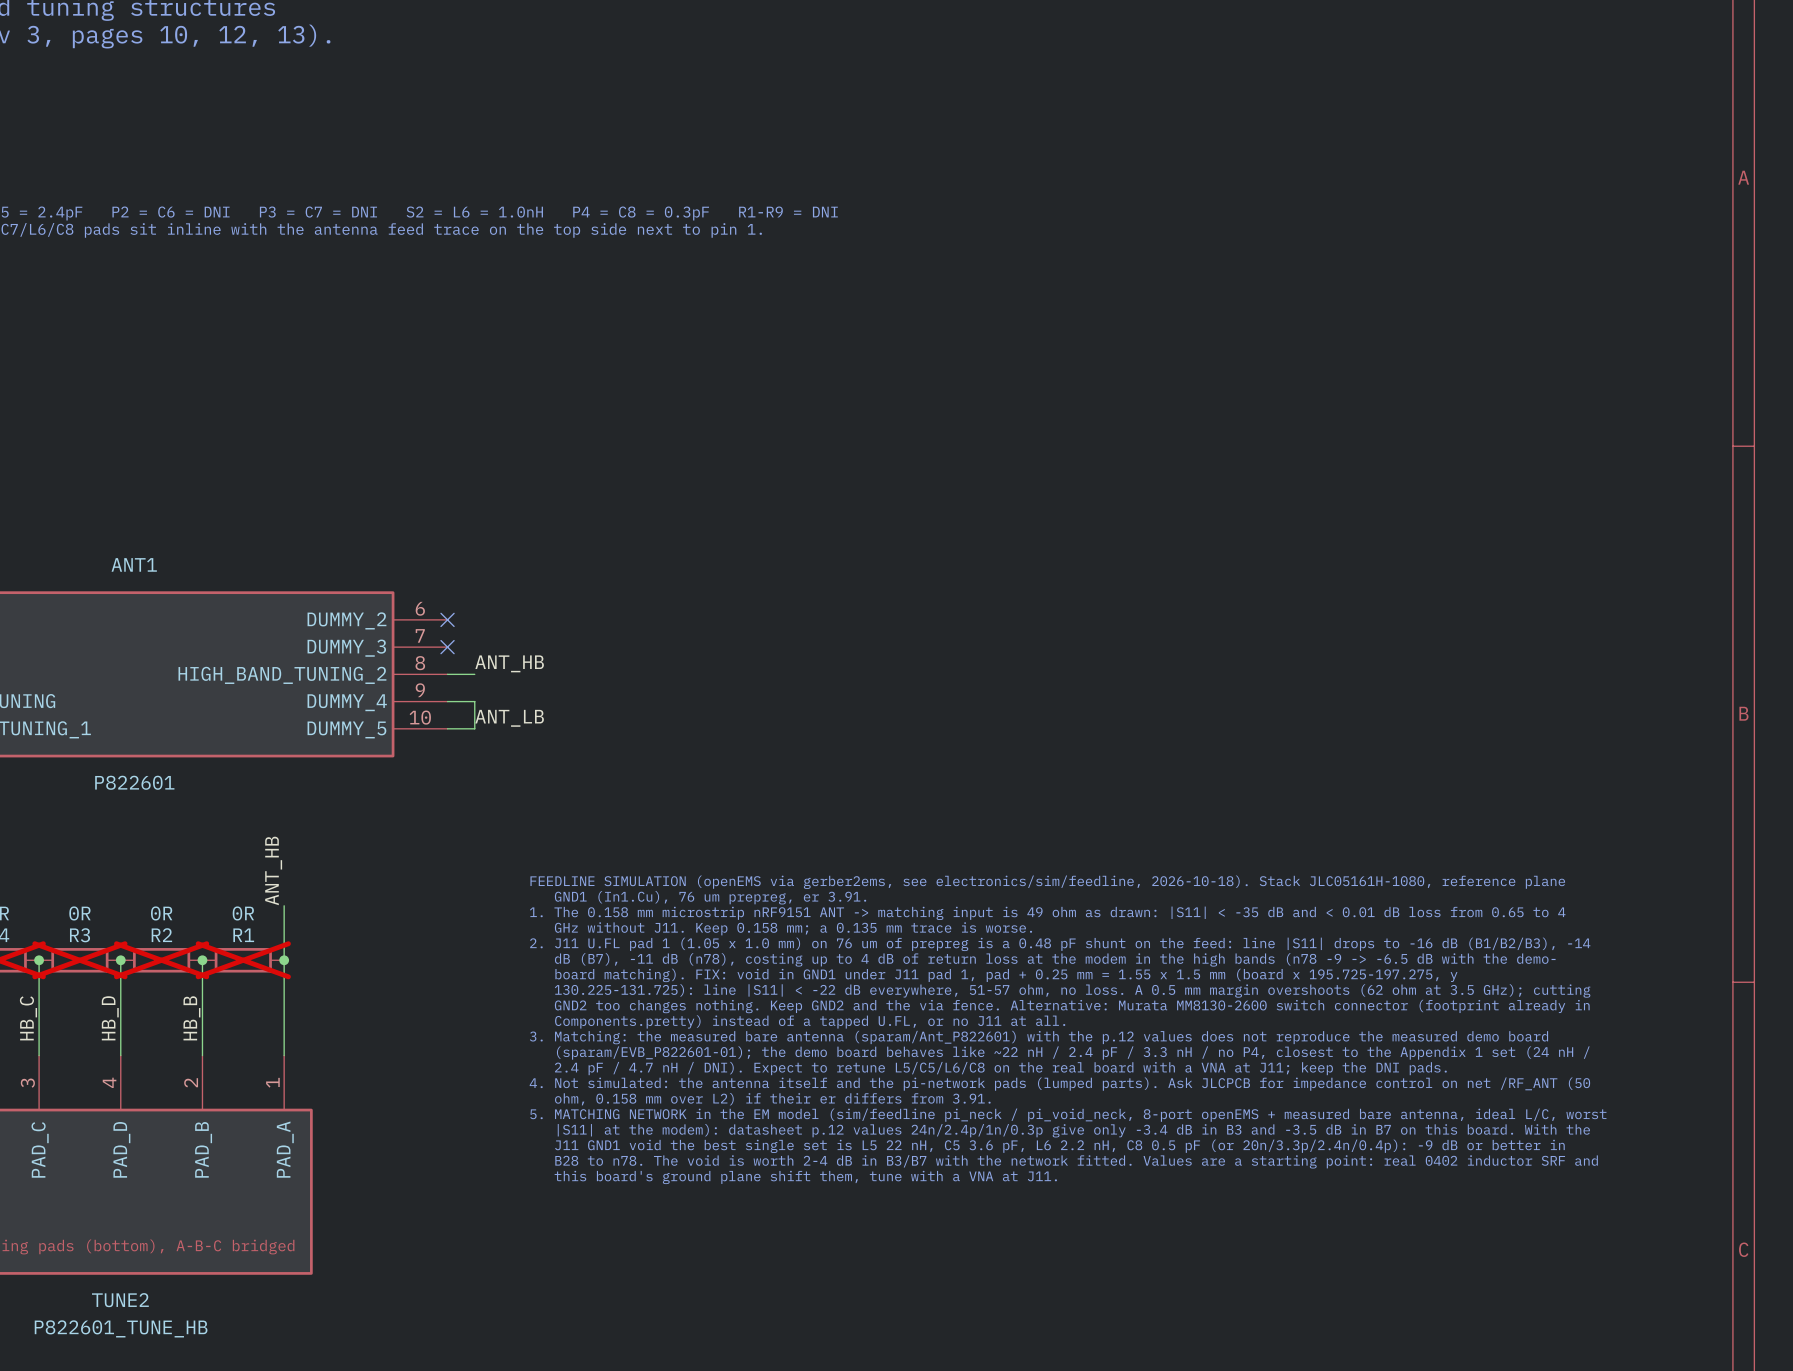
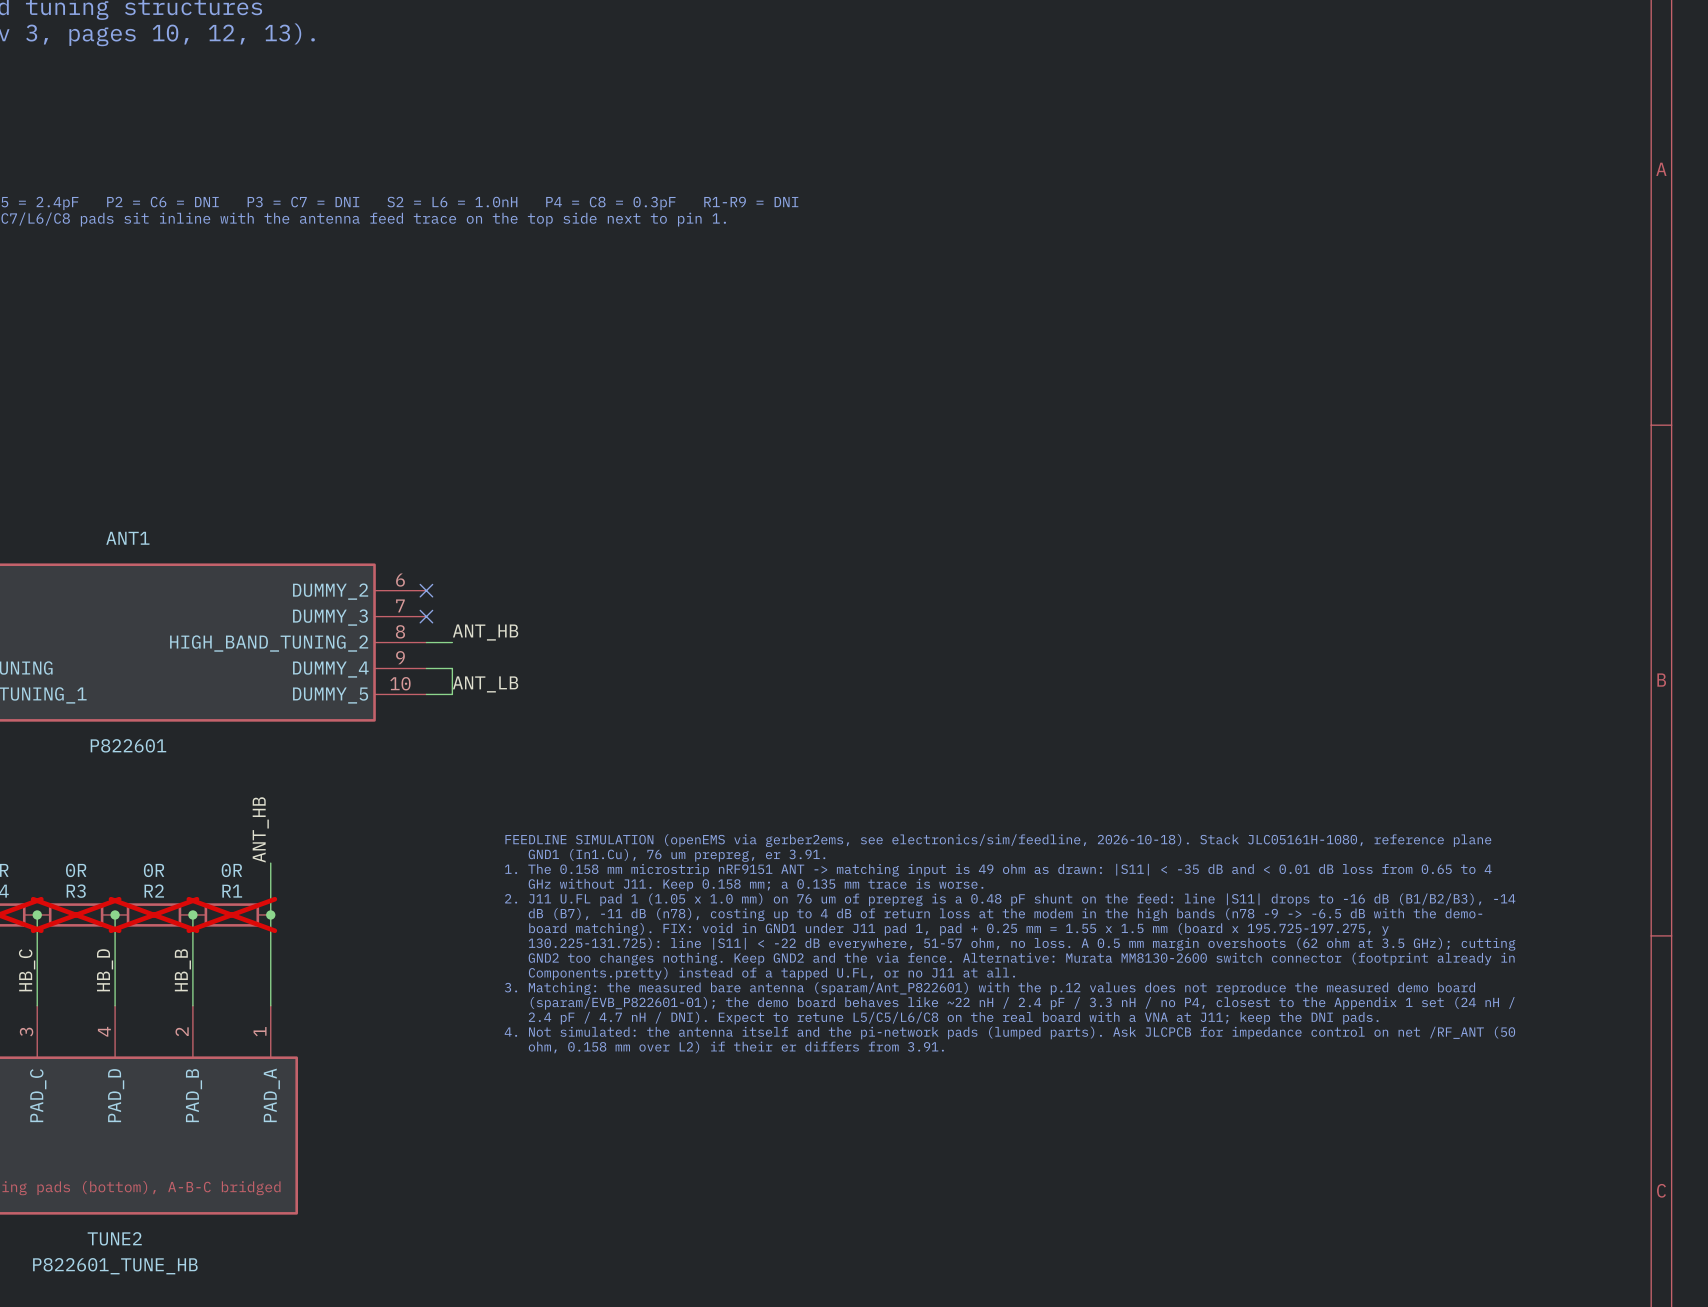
text: 5. MATCHING NETWORK in the EM model (sim/feedline pi_neck / pi_void_neck, 8-port openEMS + measured bare antenna, ideal L/C, worst (1068, 1115) -> none
text: |S11| at the modem): datasheet p.12 values 24n/2.4p/1n/0.3p give only -3.4 dB in B3 and -3.5 dB in B7 on this board. With the (1073, 1130) -> none
text: J11 GND1 void the best single set is L5 22 nH, C5 3.6 pF, L6 2.2 nH, C8 0.5 pF (or 20n/3.3p/2.4n/0.4p): -9 dB or better in (1059, 1146) -> none
text: B28 to n78. The void is worth 2-4 dB in B3/B7 with the network fitted. Values are a starting point: real 0402 inductor SRF and (1076, 1161) -> none
text: this board's ground plane shift them, tune with a VNA at J11. (805, 1177) -> none

